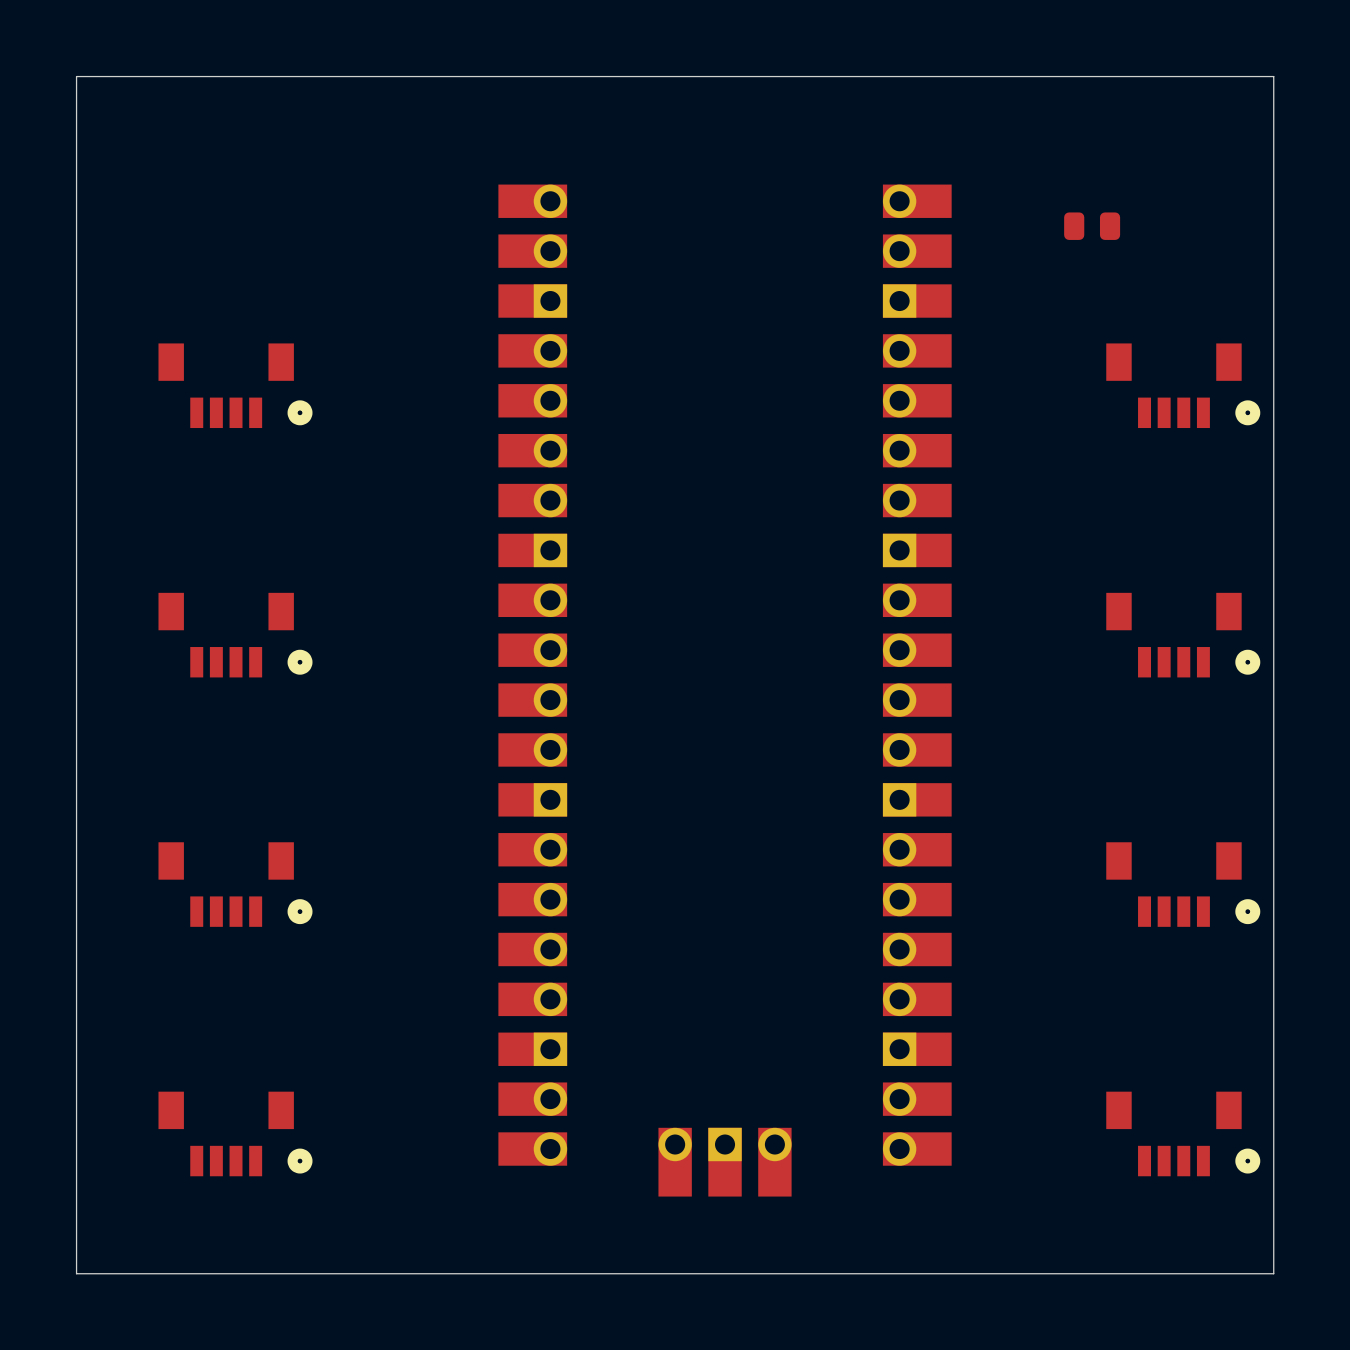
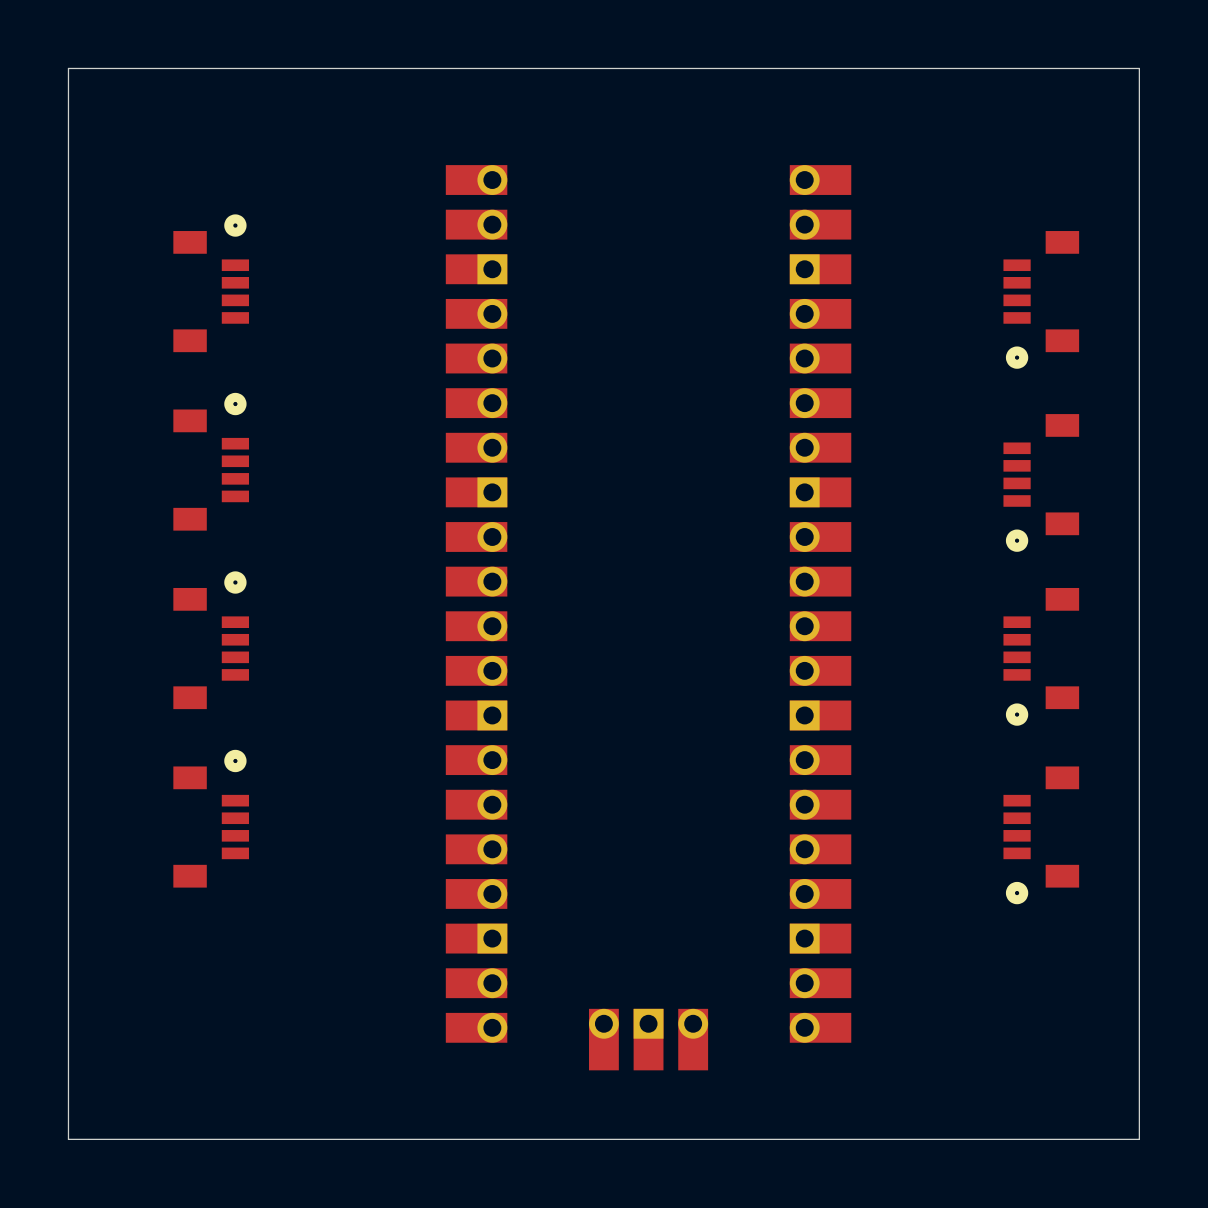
part: (1092, 226) -> none
part: none -> (211, 283)
part: (235, 385) -> none
part rotation: 0° (1183, 385) -> 90° clockwise (1041, 299)
part: none -> (211, 461)
part: none -> (1041, 482)
part: (235, 635) -> none
part: (1183, 635) -> none
part: none -> (211, 640)
part: none -> (1041, 656)
part rotation: 0° (235, 884) -> 90° counterclockwise (211, 818)
part rotation: 0° (1183, 884) -> 90° clockwise (1041, 835)
part: (235, 1133) -> none
part: (1183, 1133) -> none

